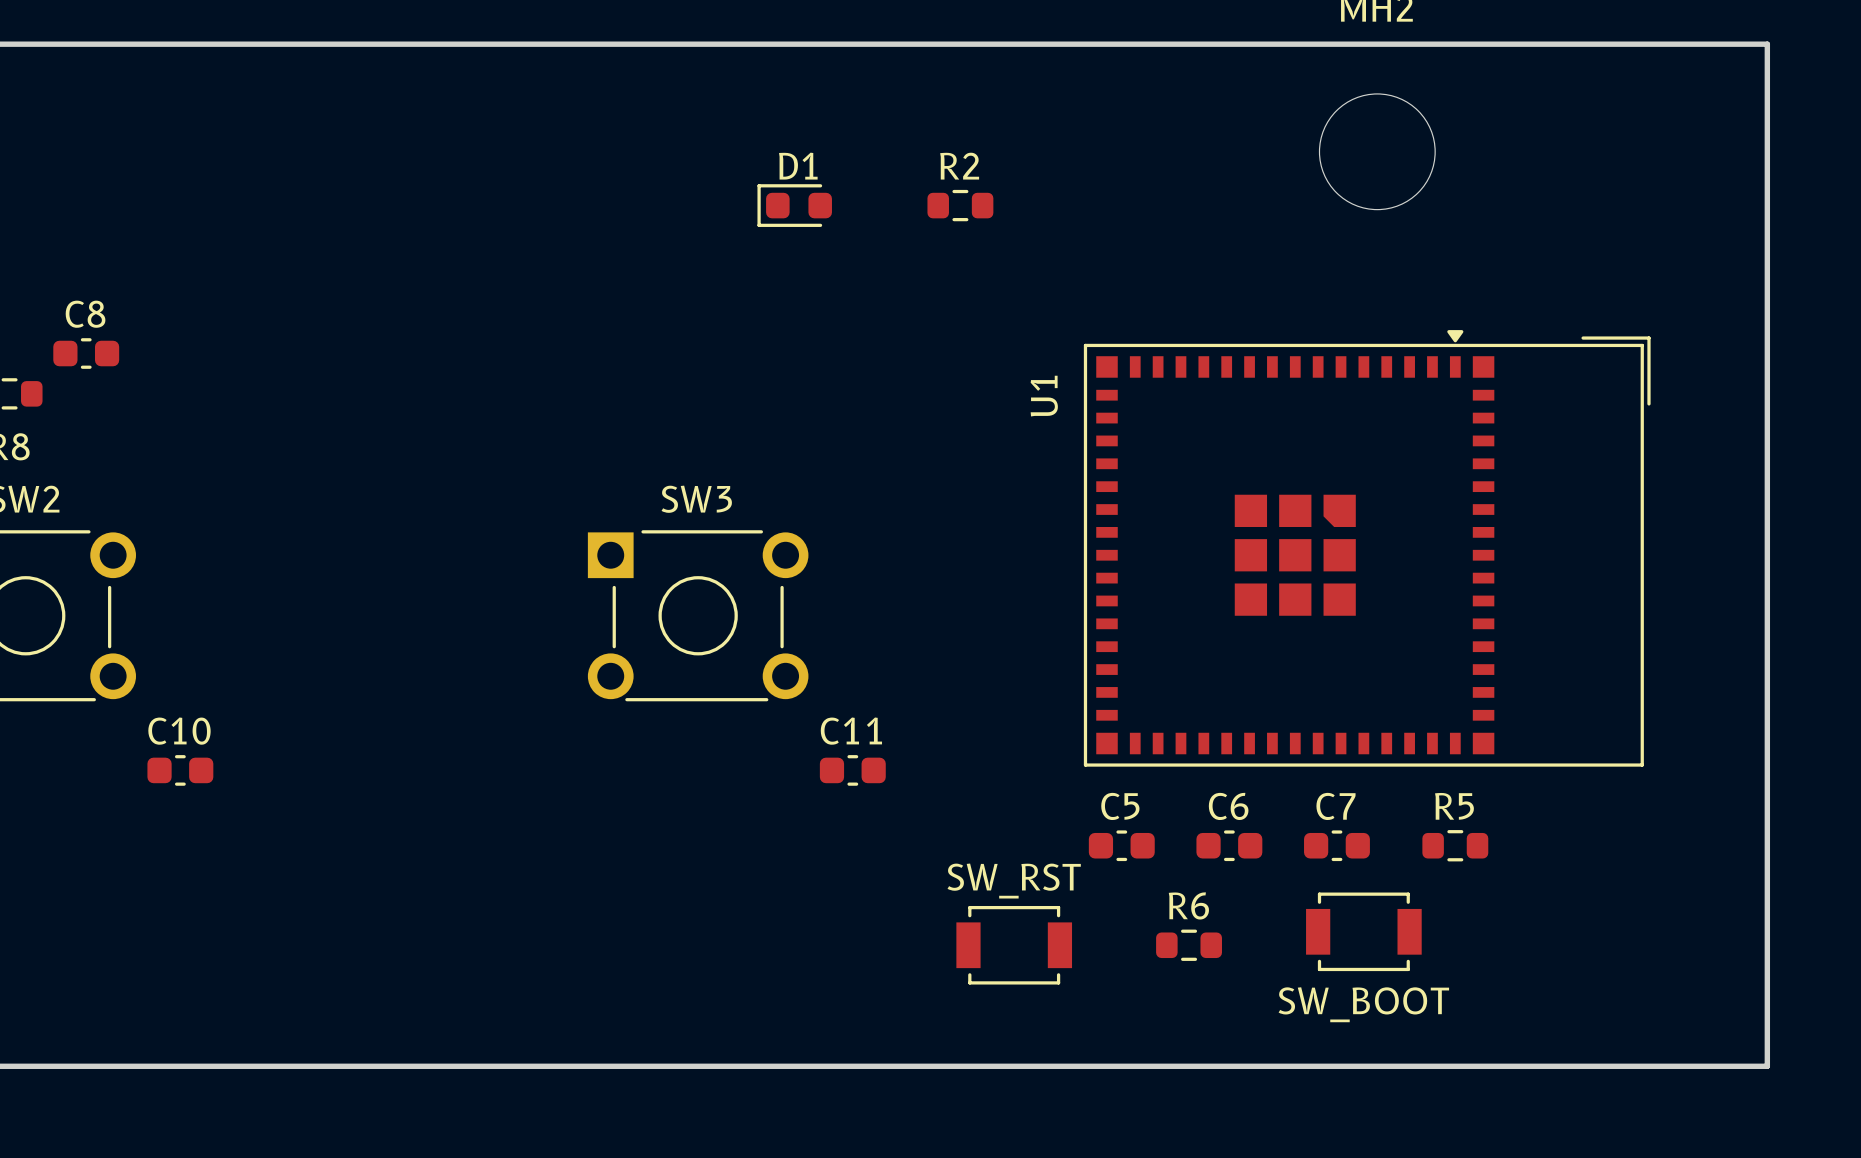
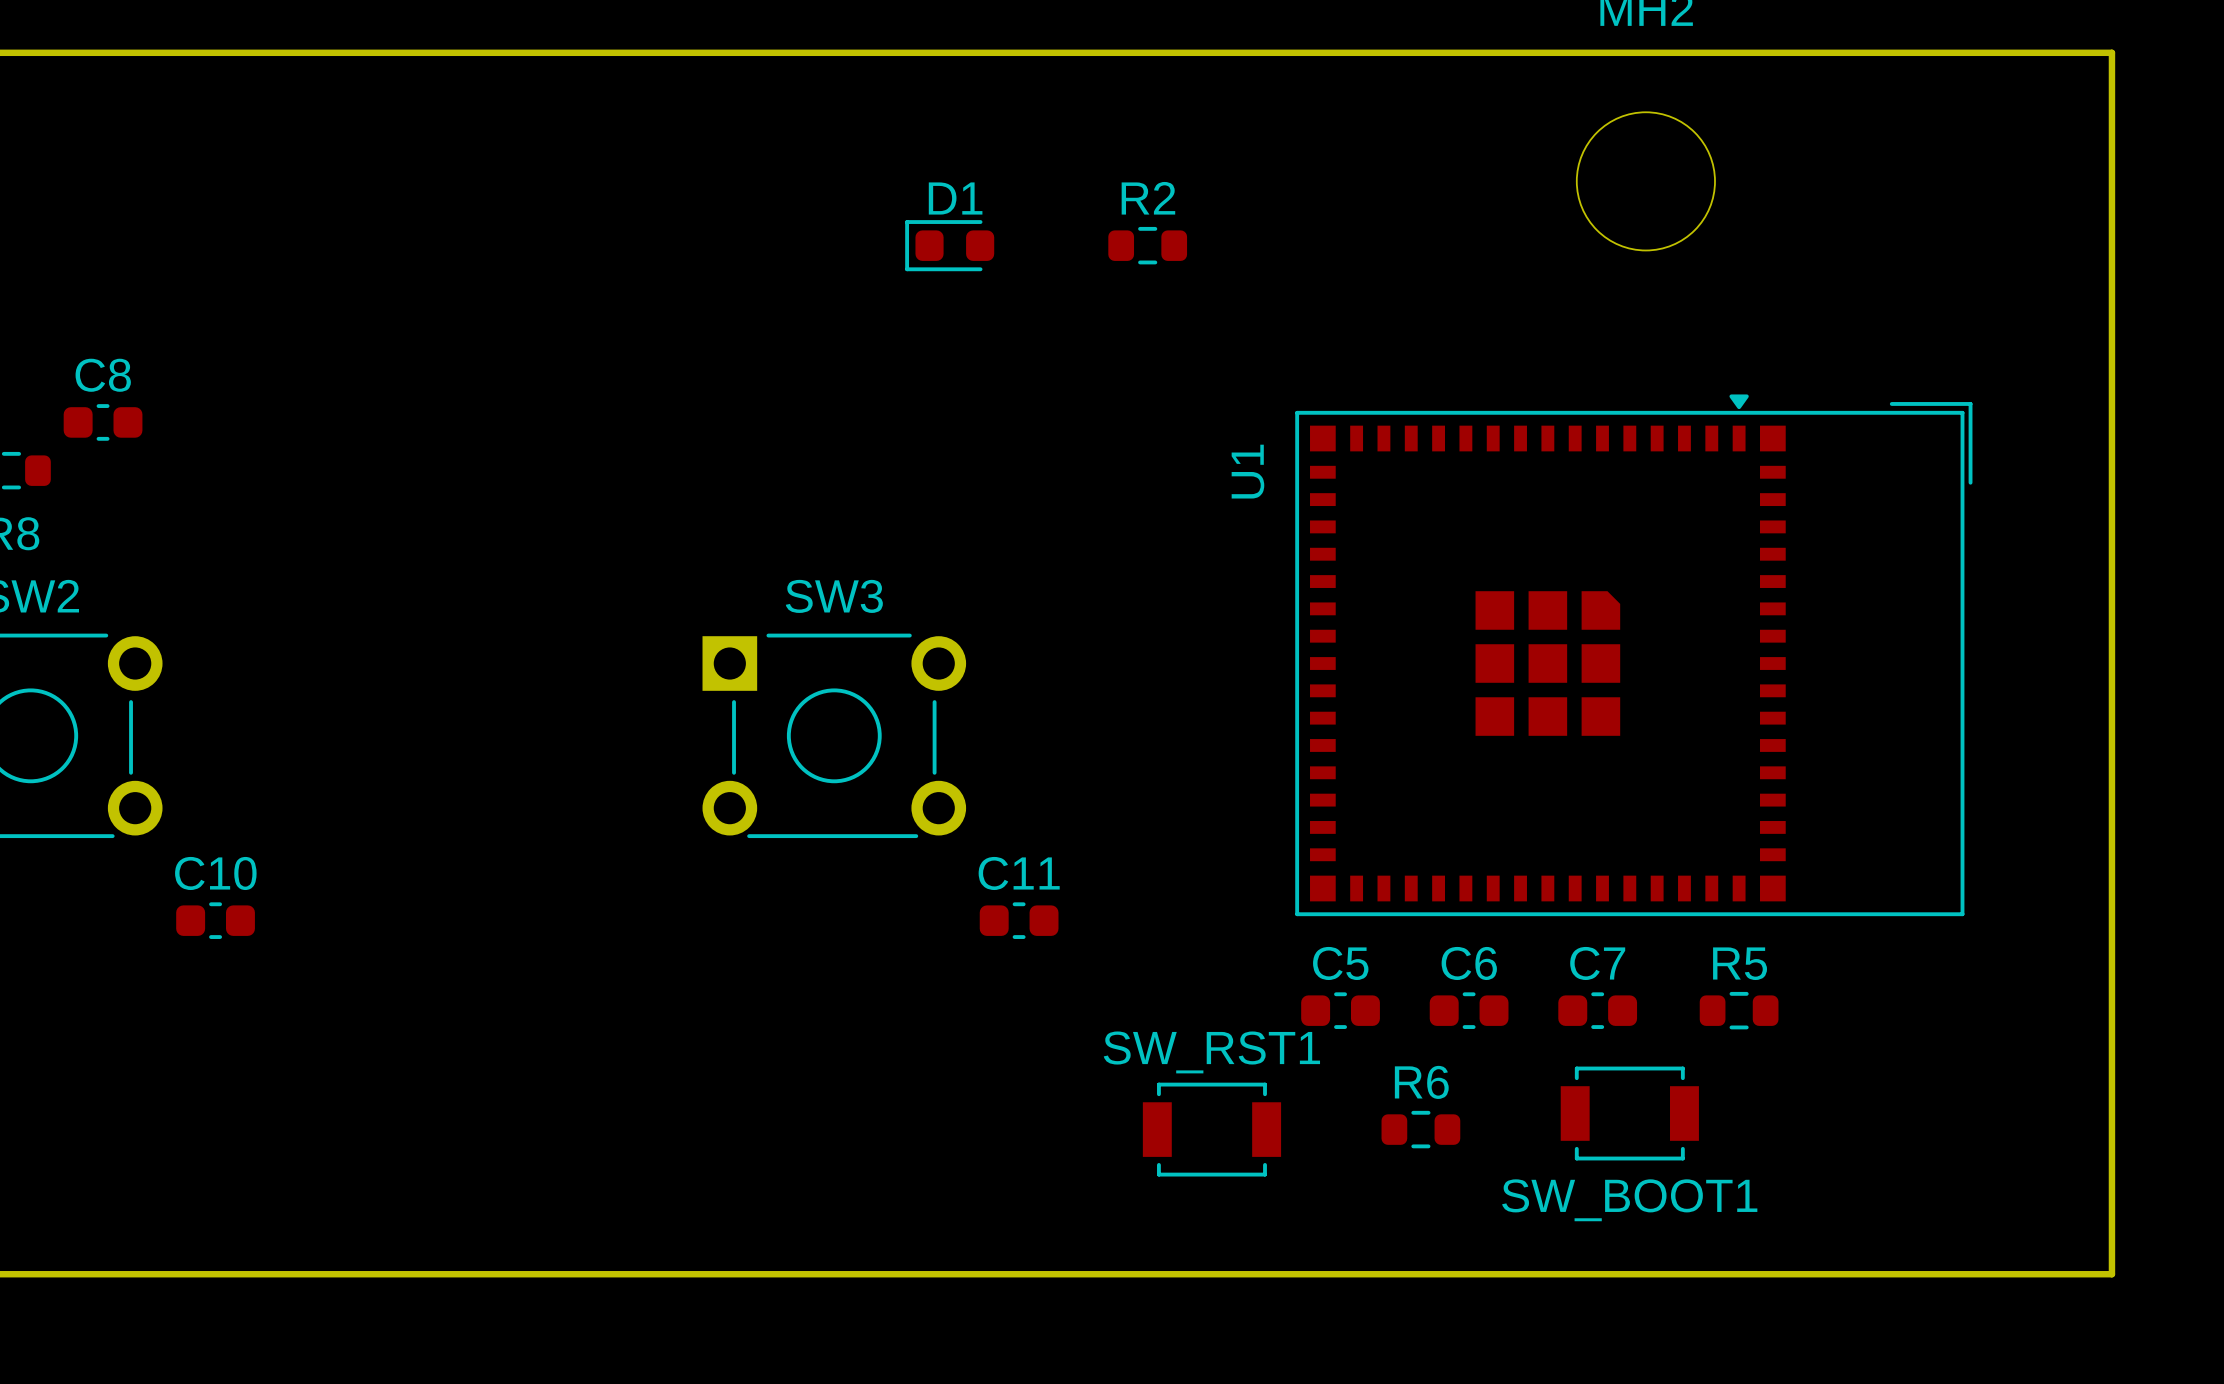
U1 footprint: [1083, 330, 1651, 767] -> [1295, 394, 1973, 917]
SW_RST name: SW_RST (1014, 881) -> SW_RST1 (1211, 1052)
SW_BOOT name: SW_BOOT (1363, 1004) -> SW_BOOT1 (1629, 1200)

